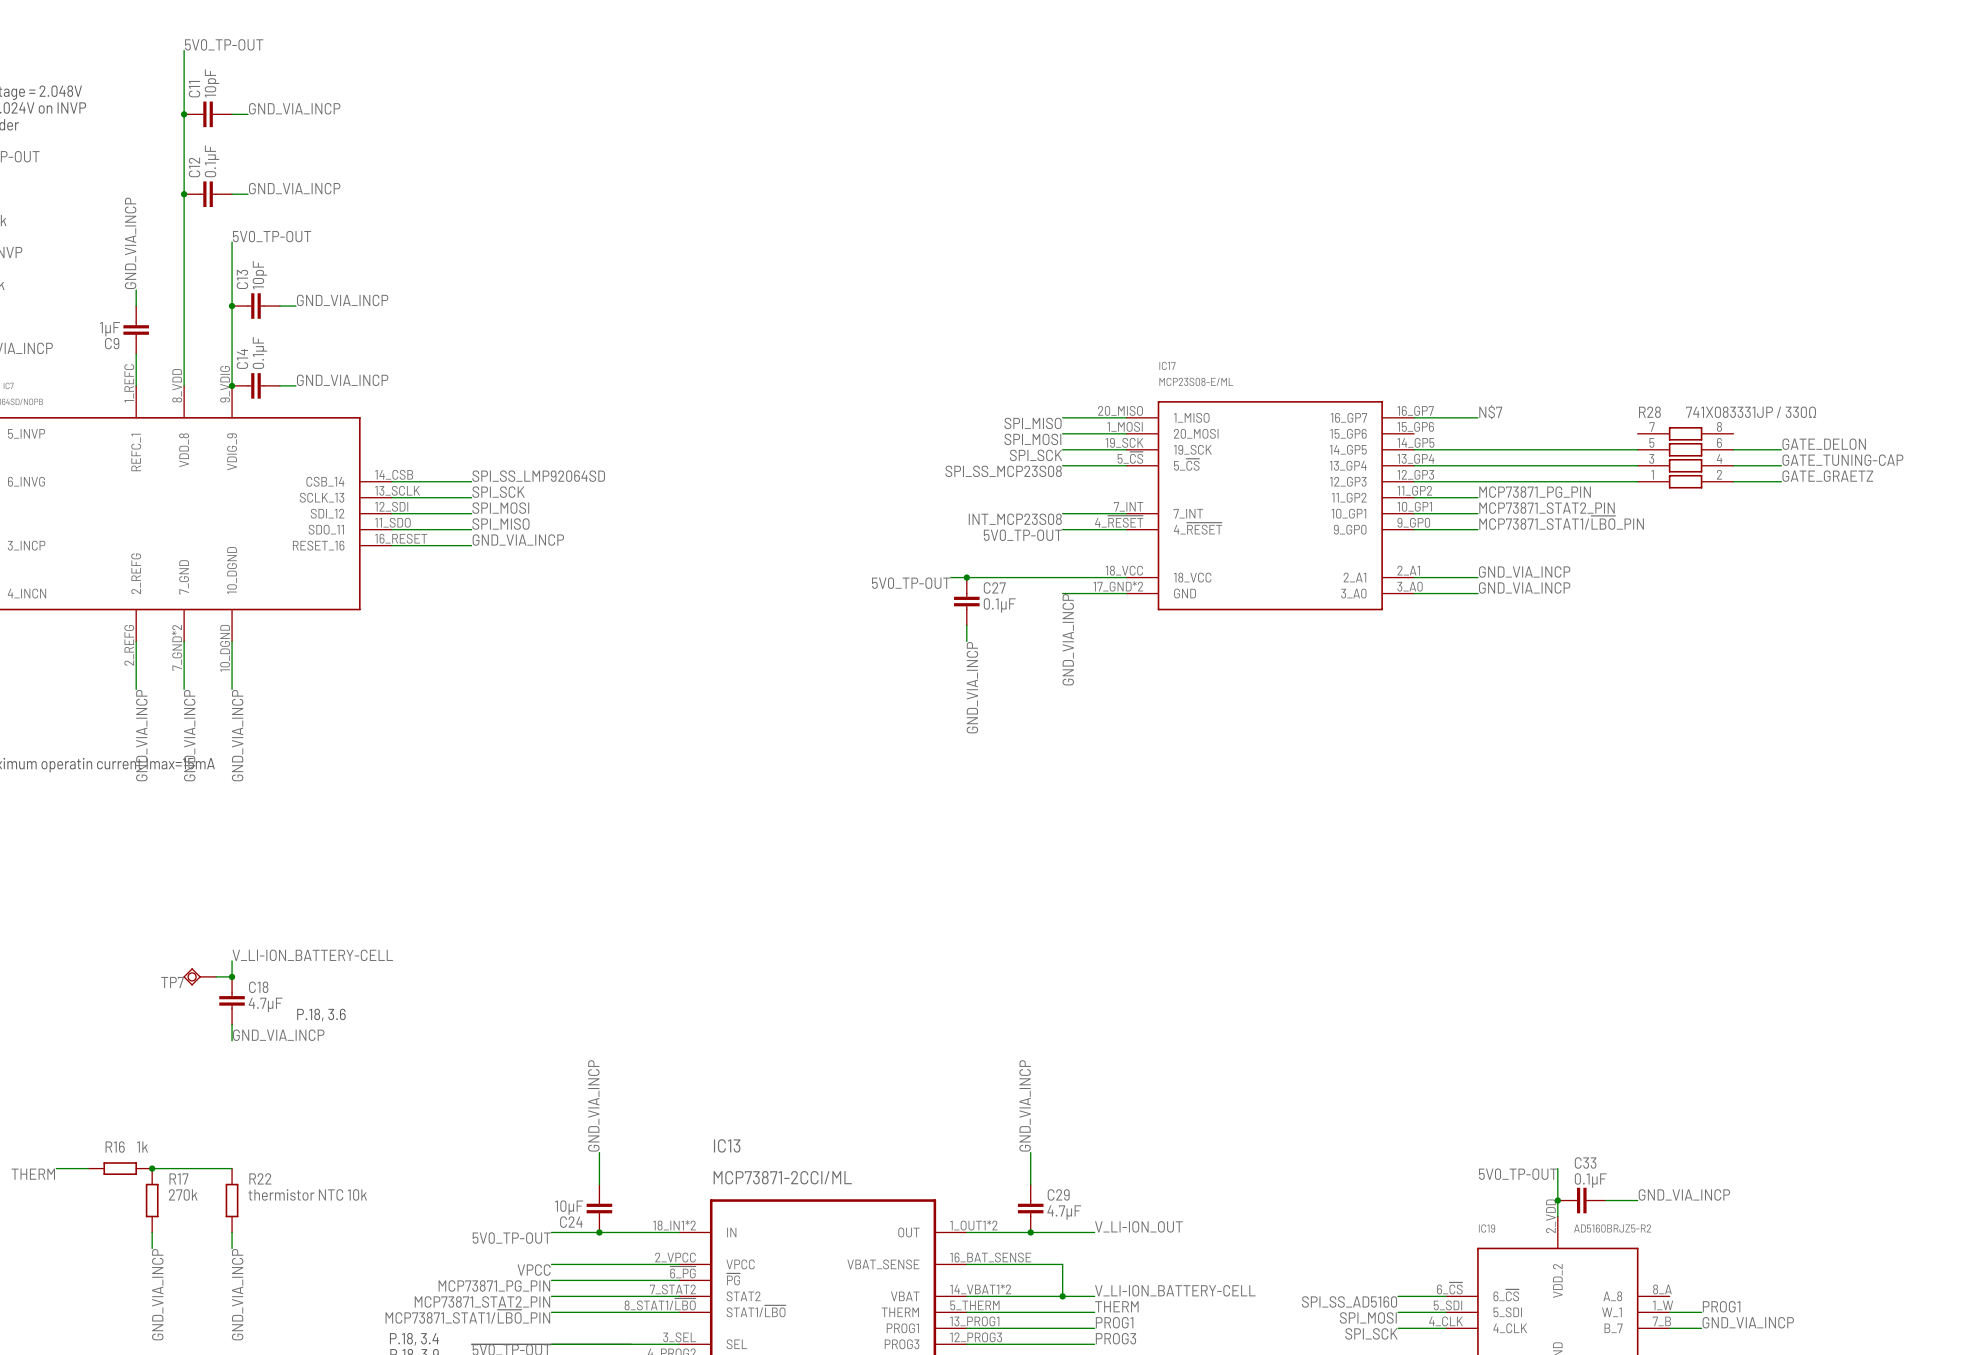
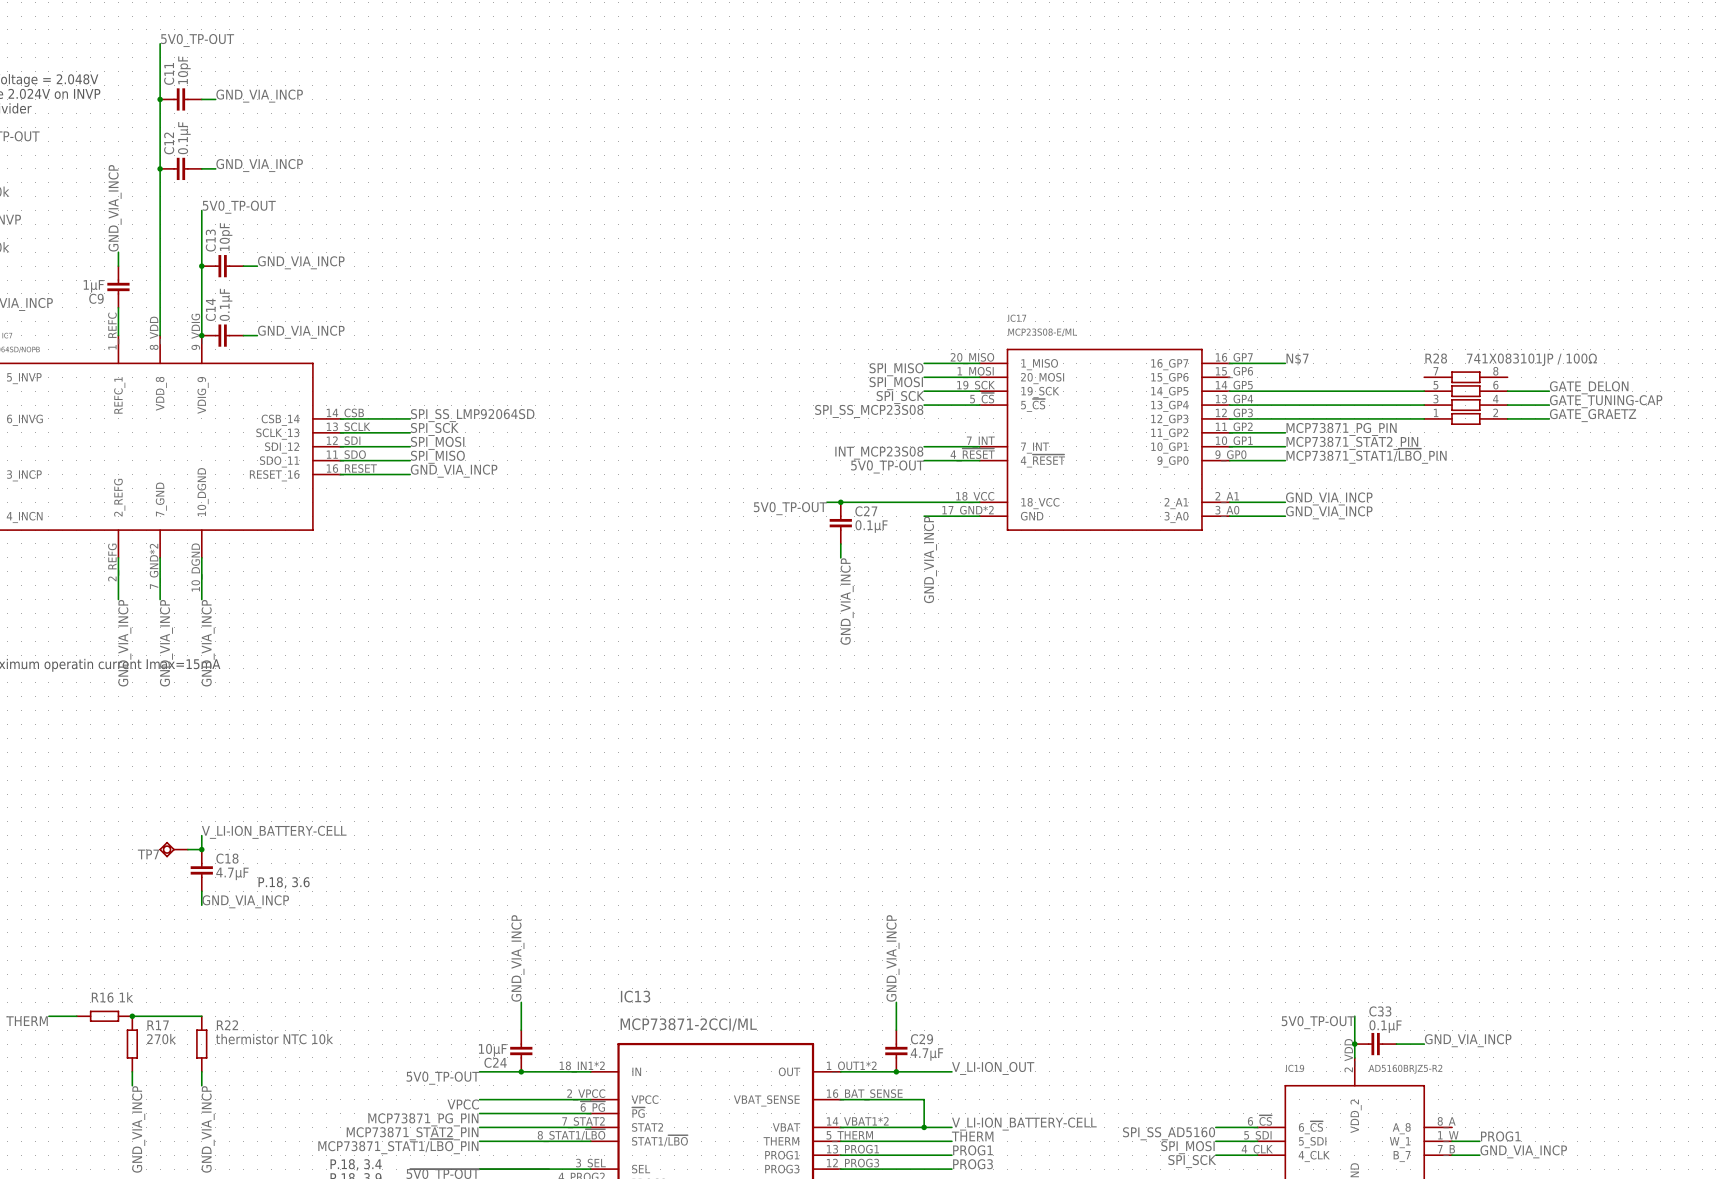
R28 value: 741X083331JP / 330Ω (1751, 412) -> 741X083101JP / 100Ω (1531, 359)

